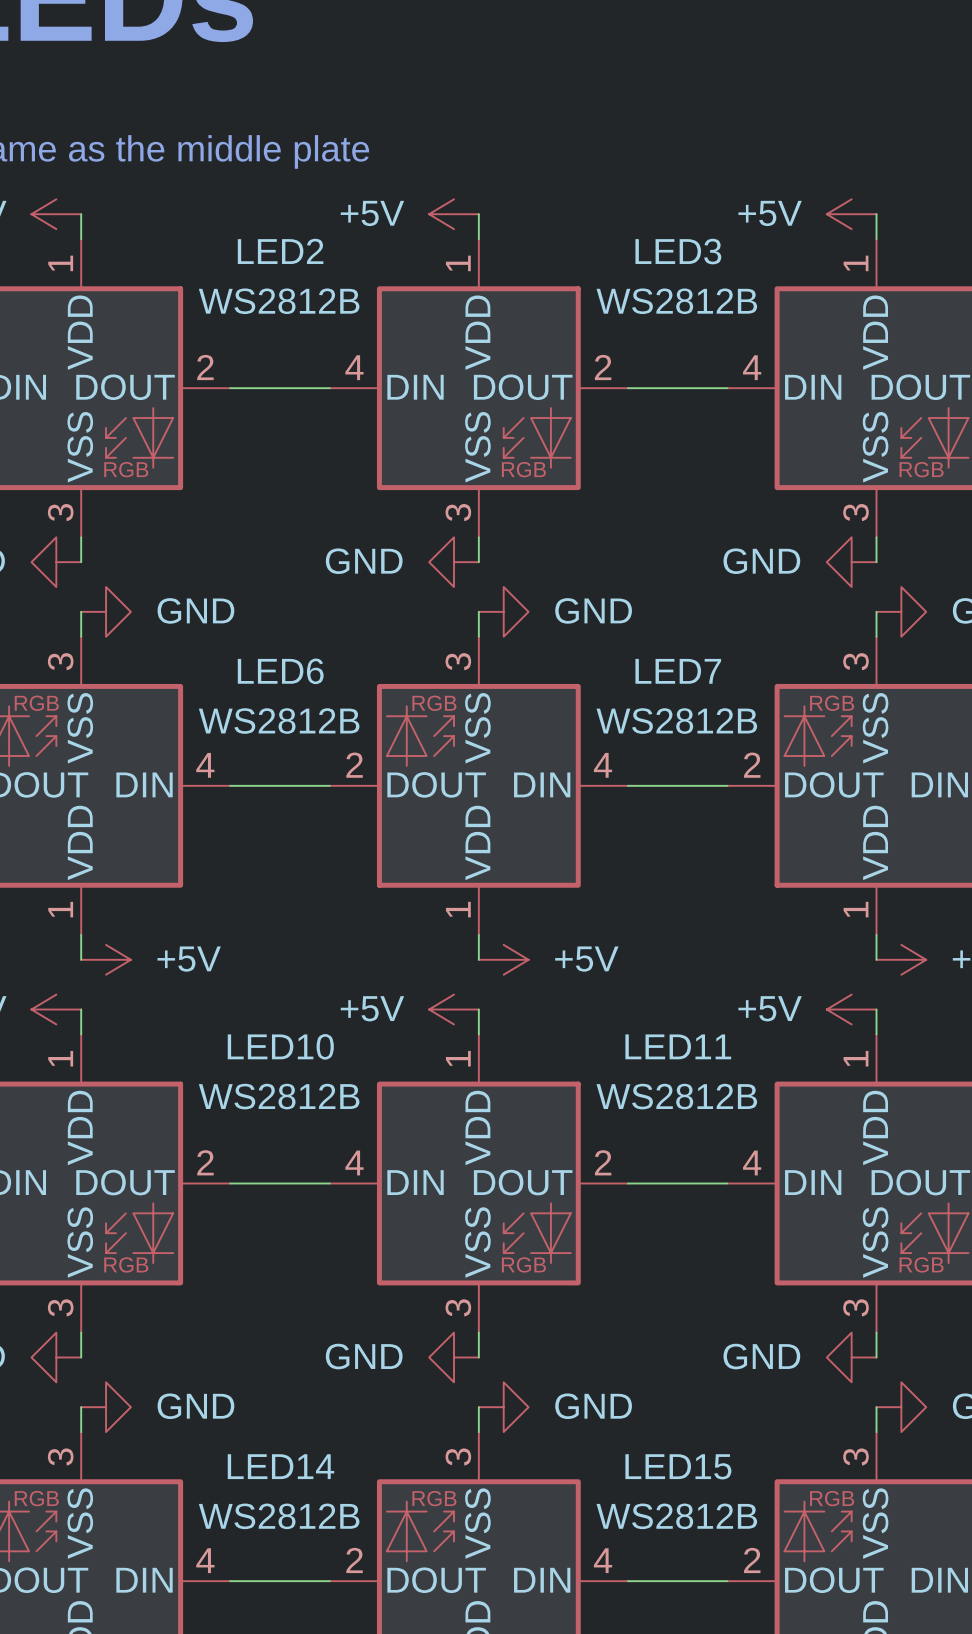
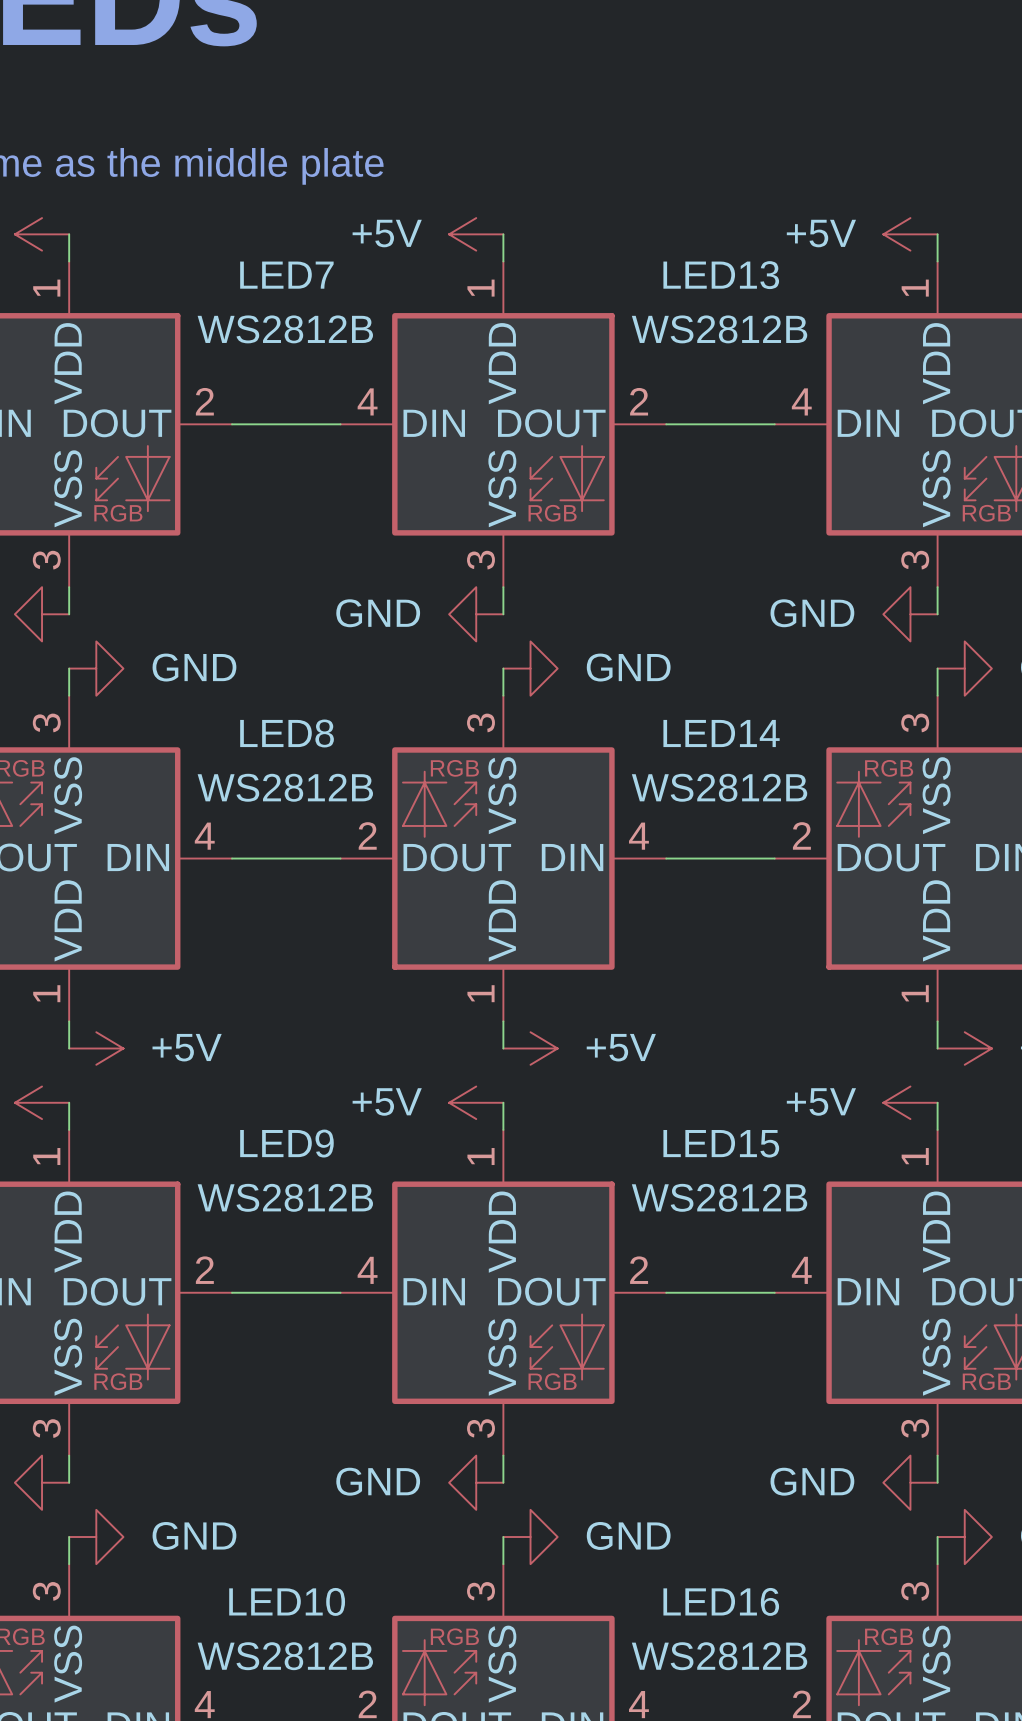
LED2 name: LED2 (280, 251) -> LED7 (286, 275)
LED3 name: LED3 (678, 251) -> LED13 (721, 275)
LED6 name: LED6 (280, 671) -> LED8 (287, 733)
LED7 name: LED7 (678, 671) -> LED14 (721, 733)
LED10 name: LED10 (280, 1046) -> LED9 (286, 1143)
LED11 name: LED11 (678, 1046) -> LED15 (721, 1143)
LED14 name: LED14 (280, 1466) -> LED10 (287, 1601)
LED15 name: LED15 (678, 1466) -> LED16 (721, 1601)

